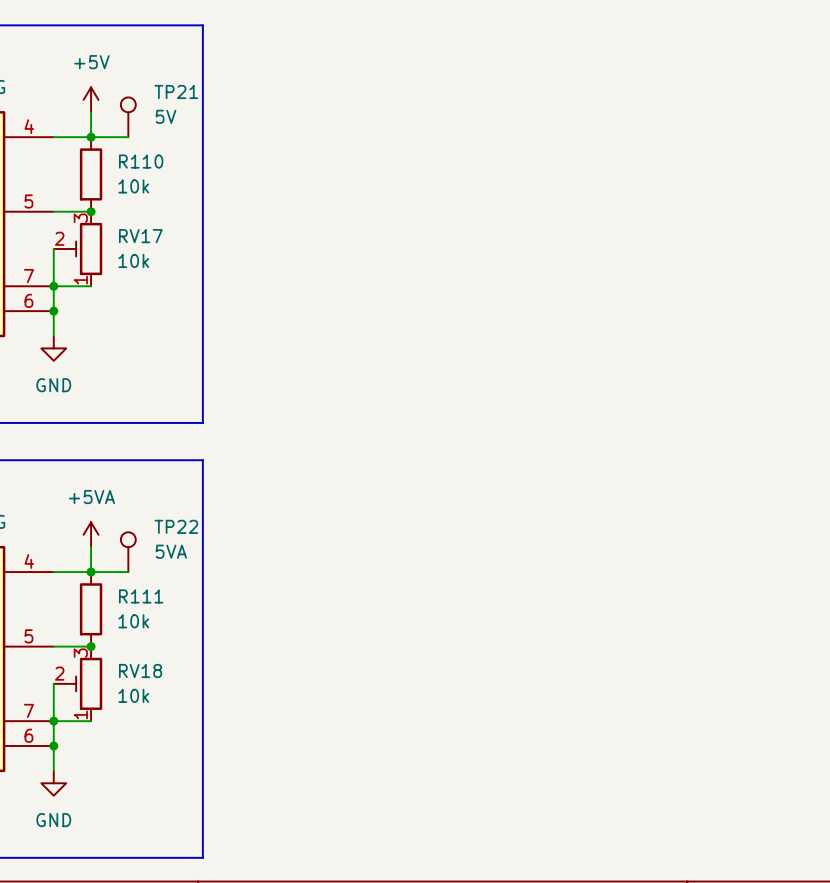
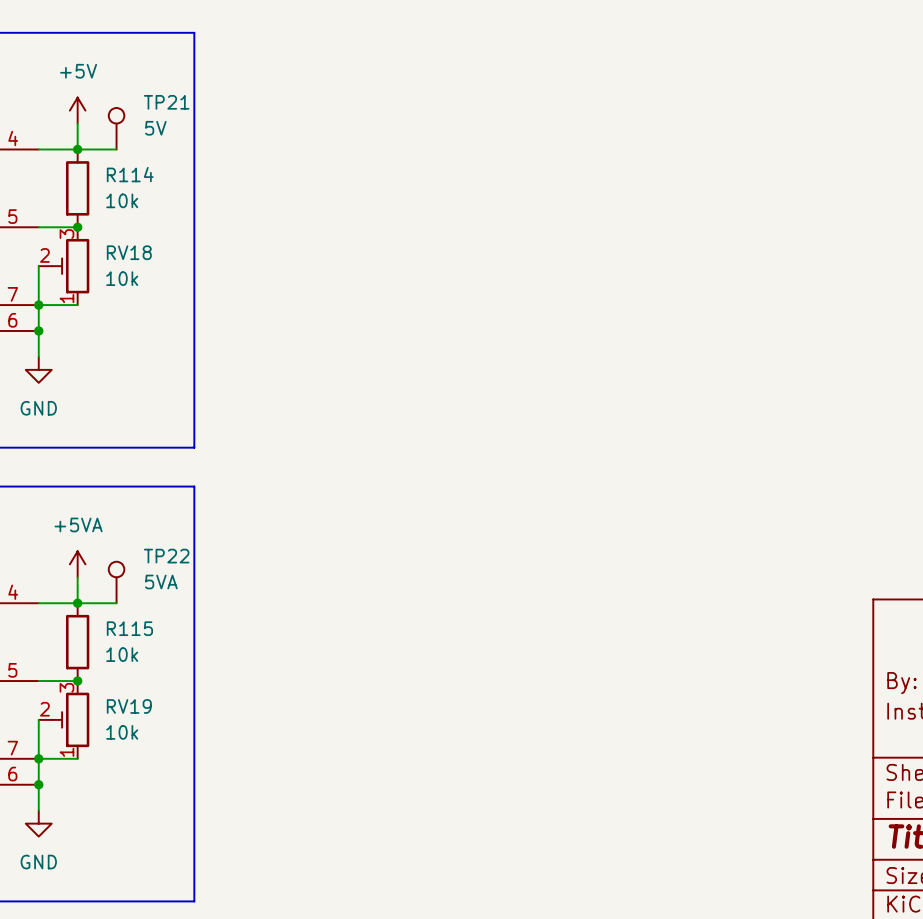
R110 name: R110 (141, 161) -> R114 (130, 174)
RV17 name: RV17 (140, 236) -> RV18 (129, 252)
R111 name: R111 (141, 596) -> R115 (129, 628)
RV18 name: RV18 (140, 670) -> RV19 (129, 706)

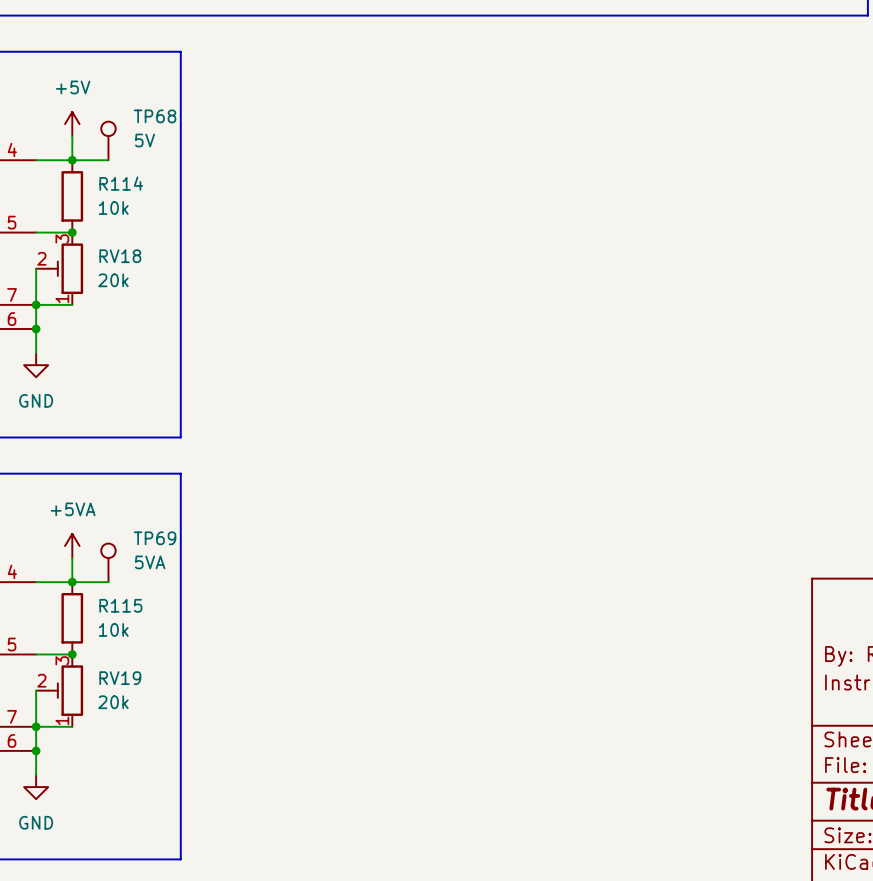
TP21 name: TP21 (166, 102) -> TP68 (155, 116)
RV18 value: 10k (122, 278) -> 20k (113, 280)
TP22 name: TP22 (166, 556) -> TP69 (155, 538)
RV19 value: 10k (122, 732) -> 20k (113, 702)

